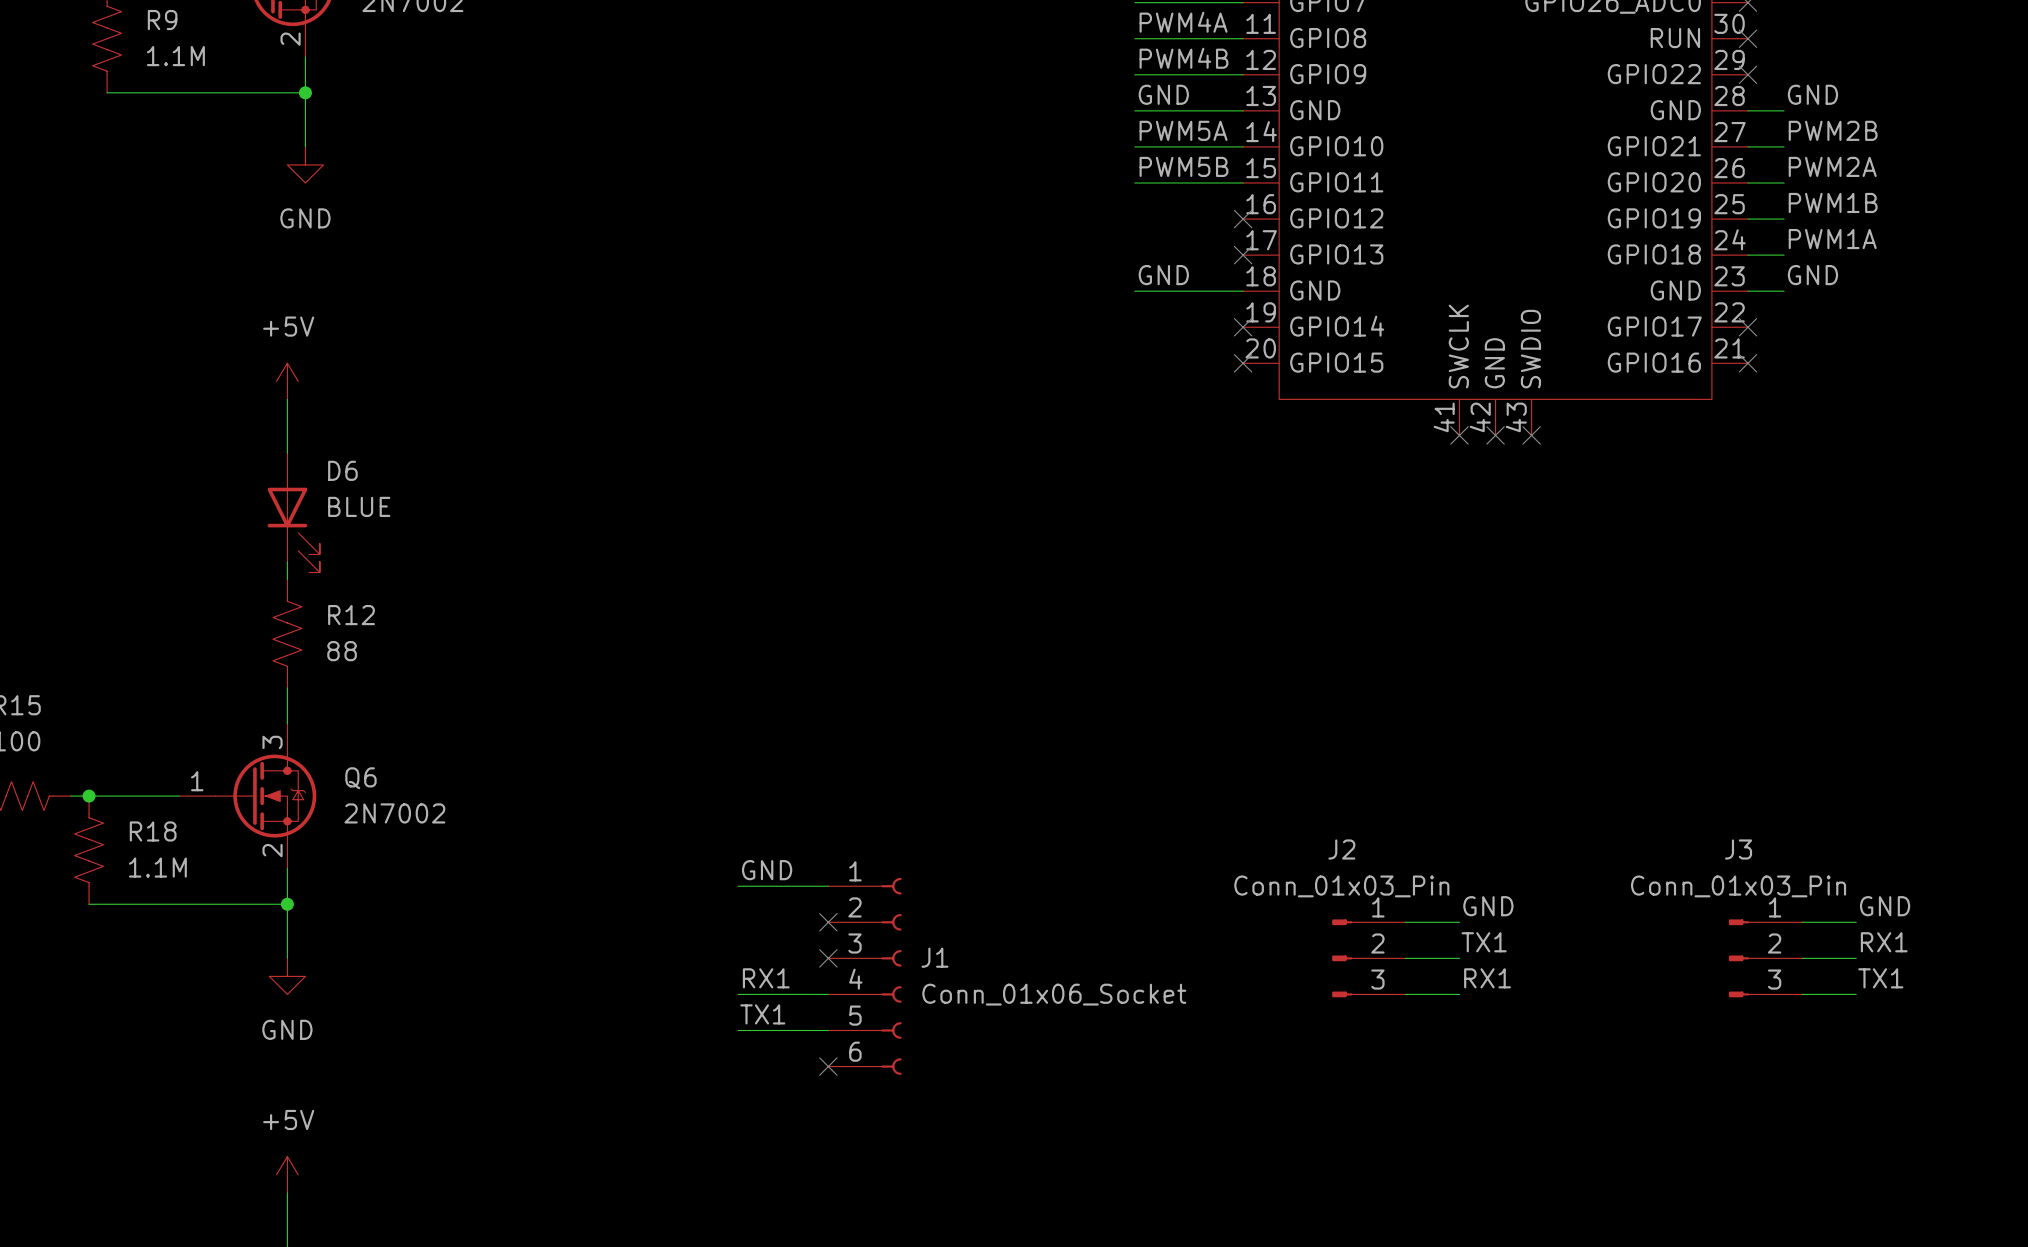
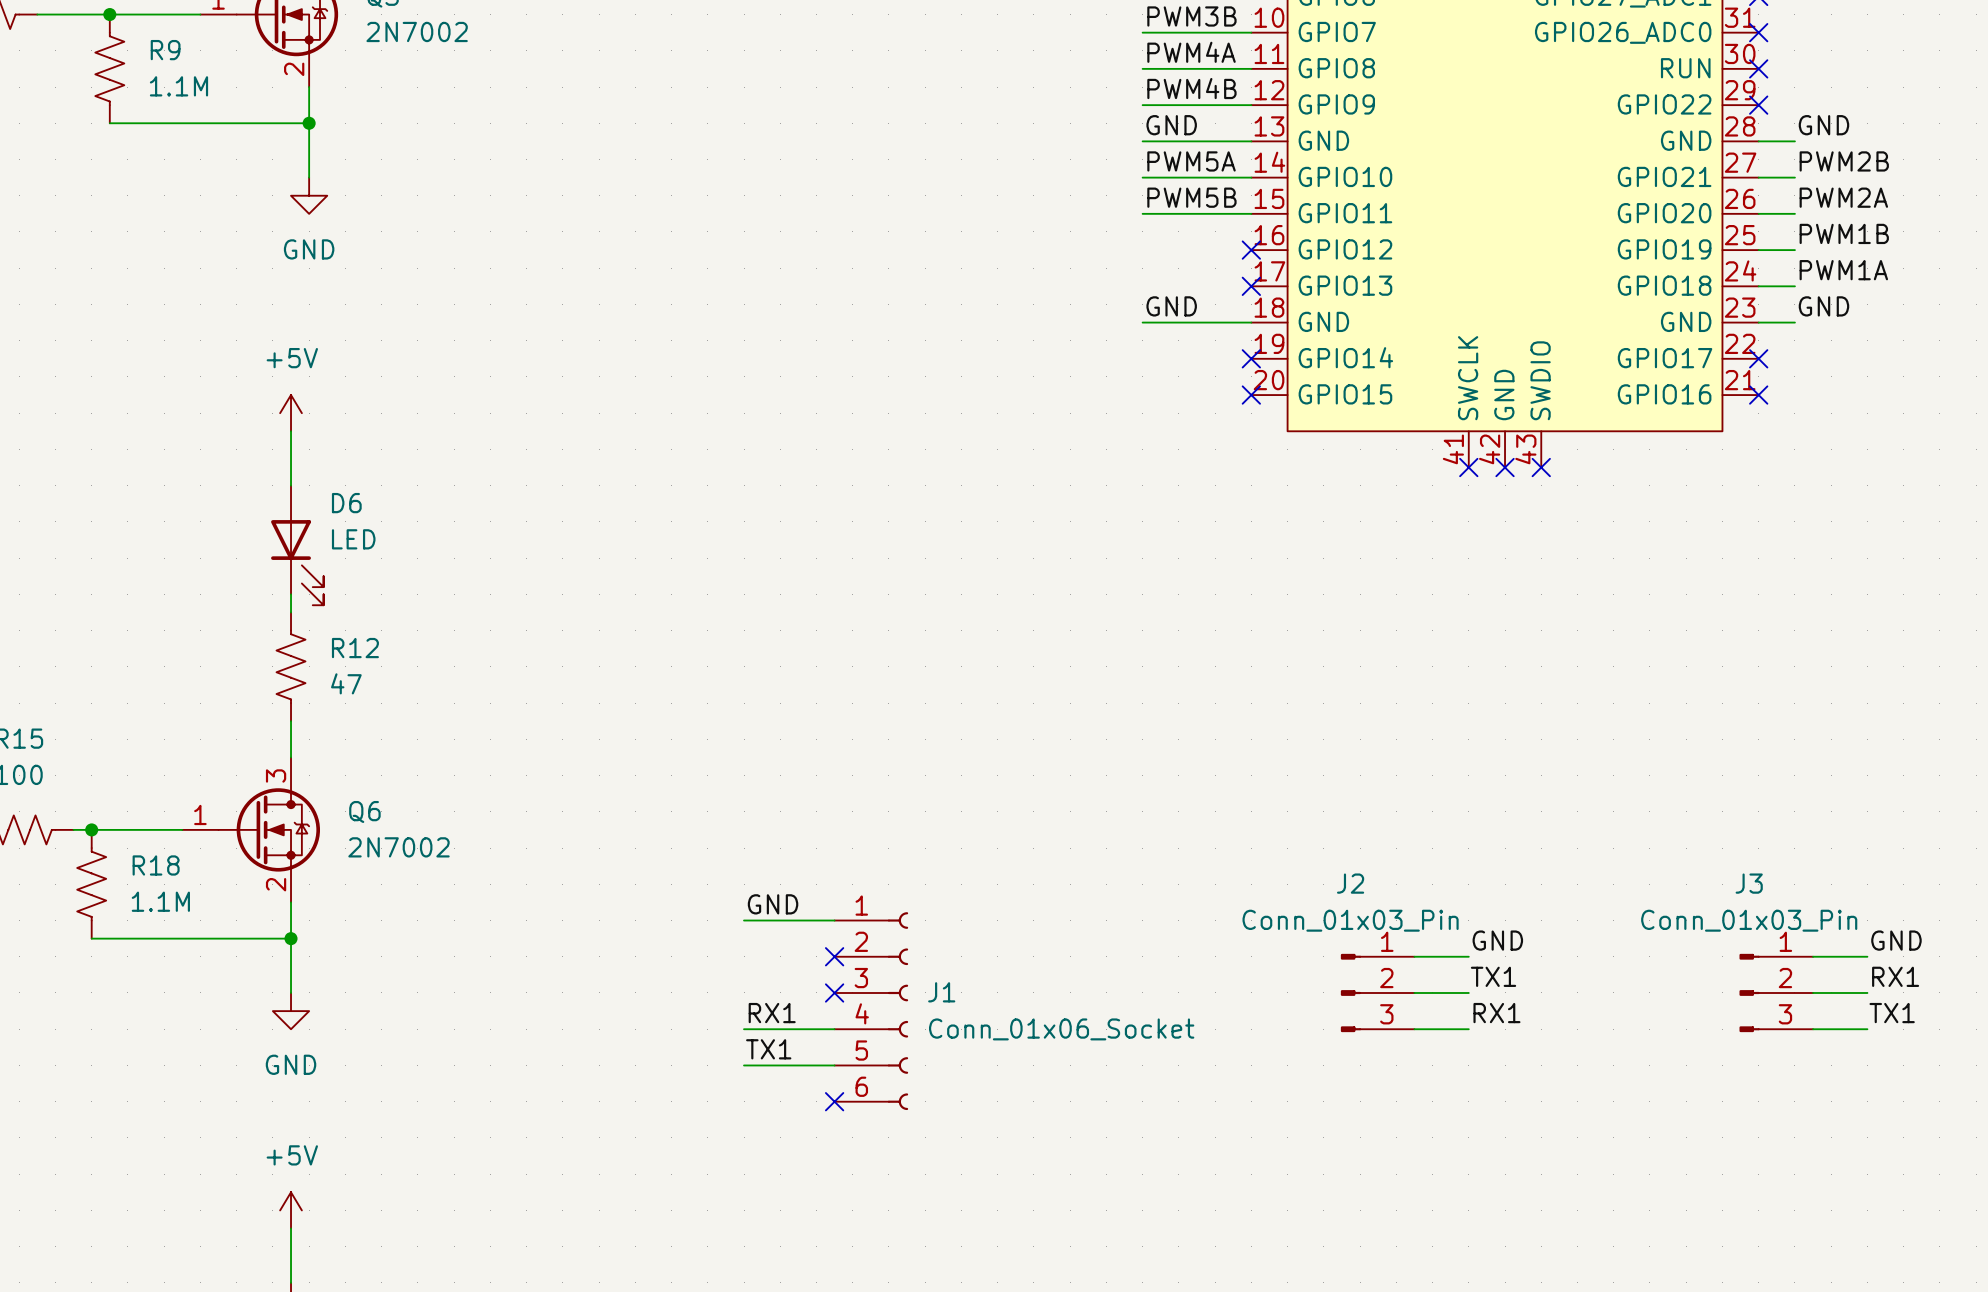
D6 value: BLUE (359, 506) -> LED (353, 539)
R12 value: 88 (342, 651) -> 47 (346, 683)

